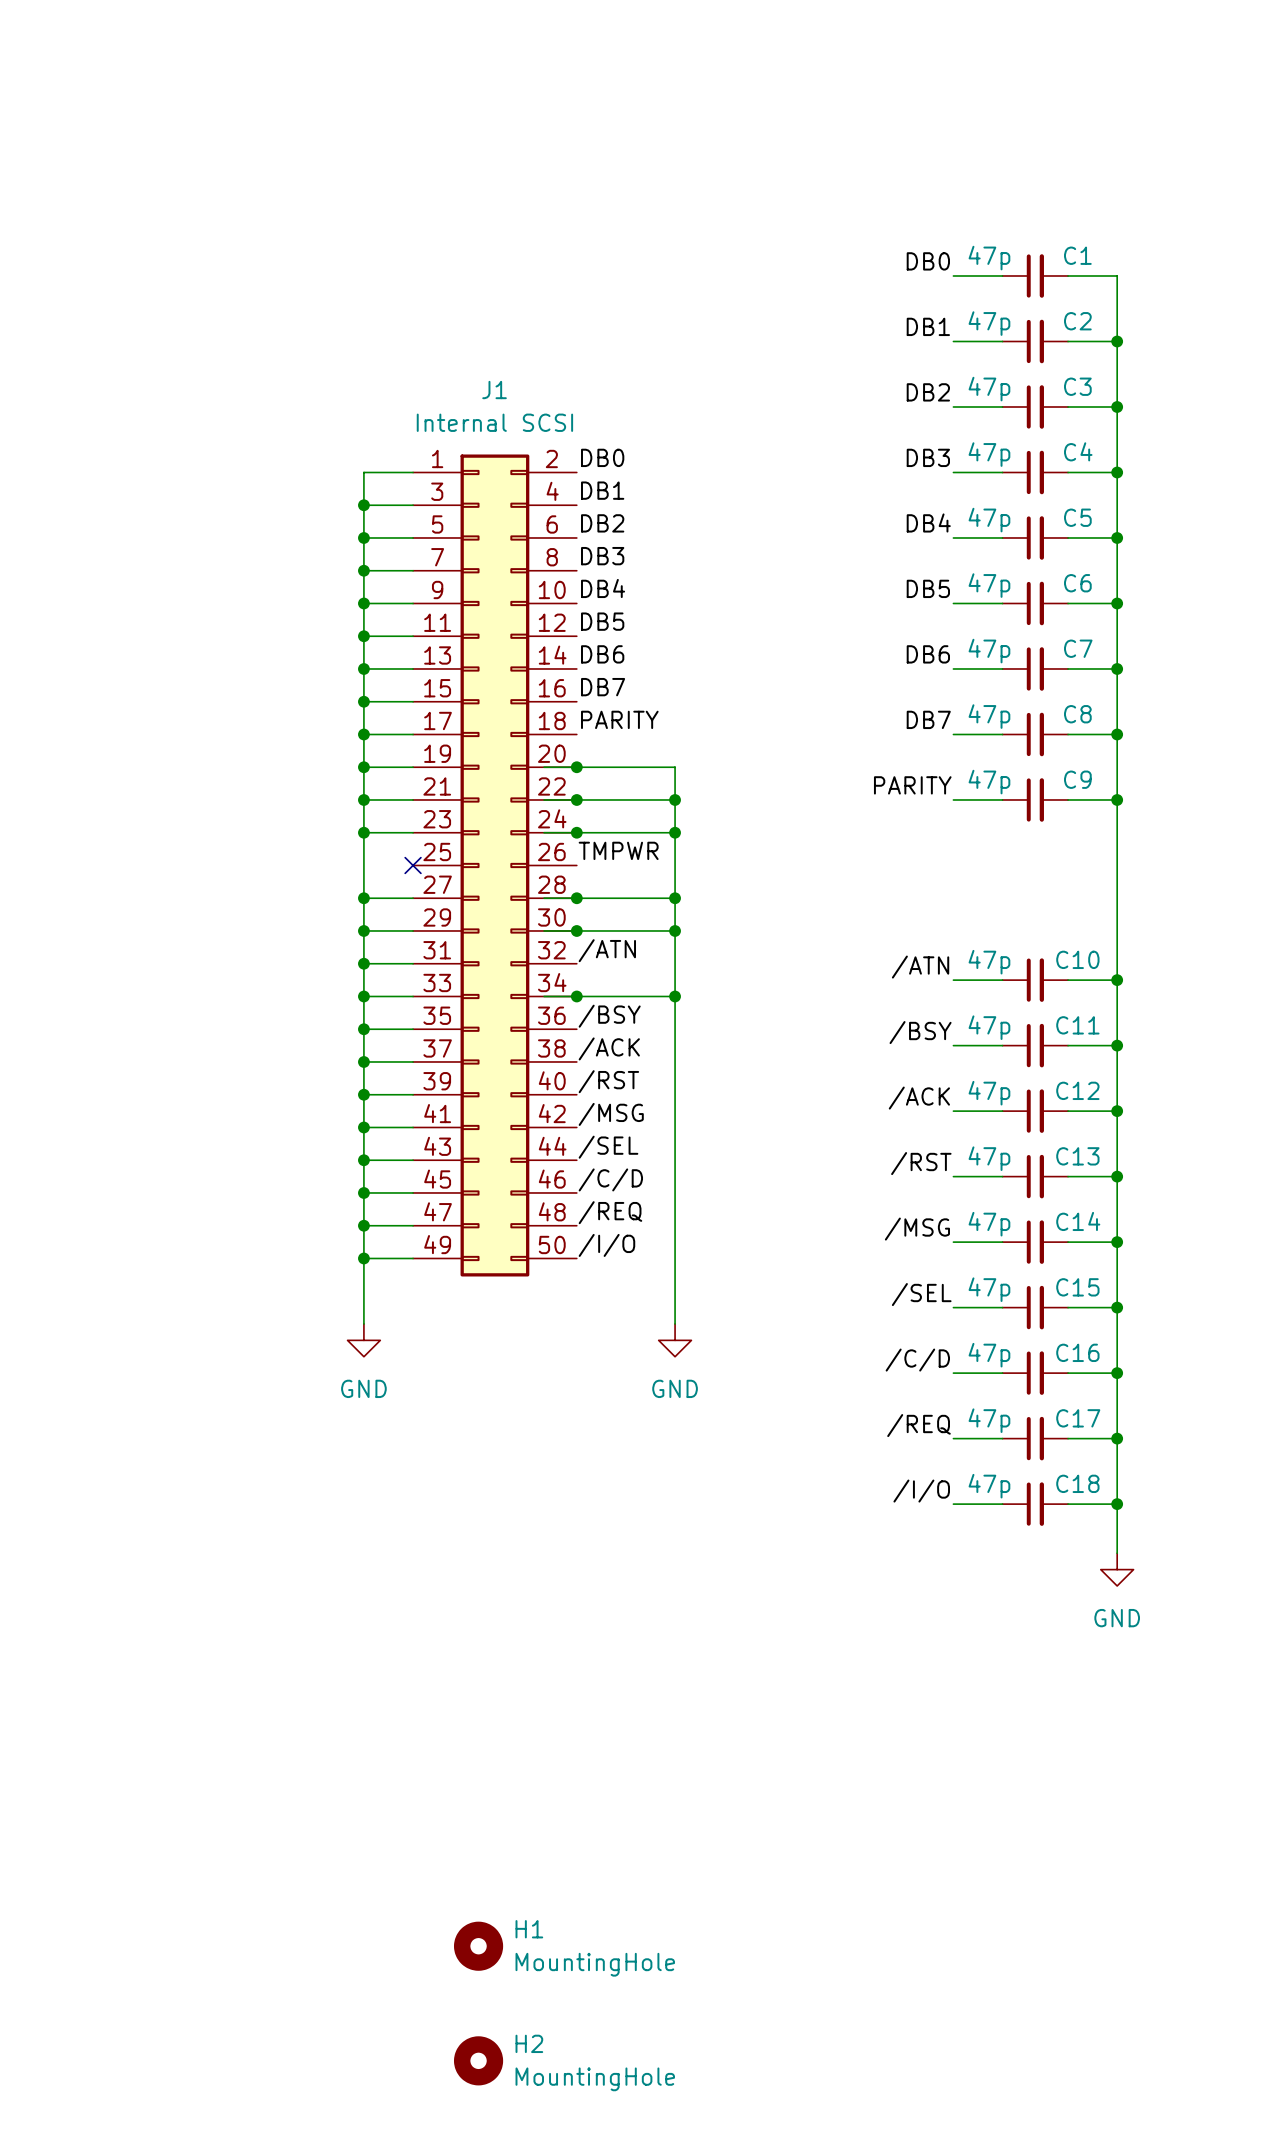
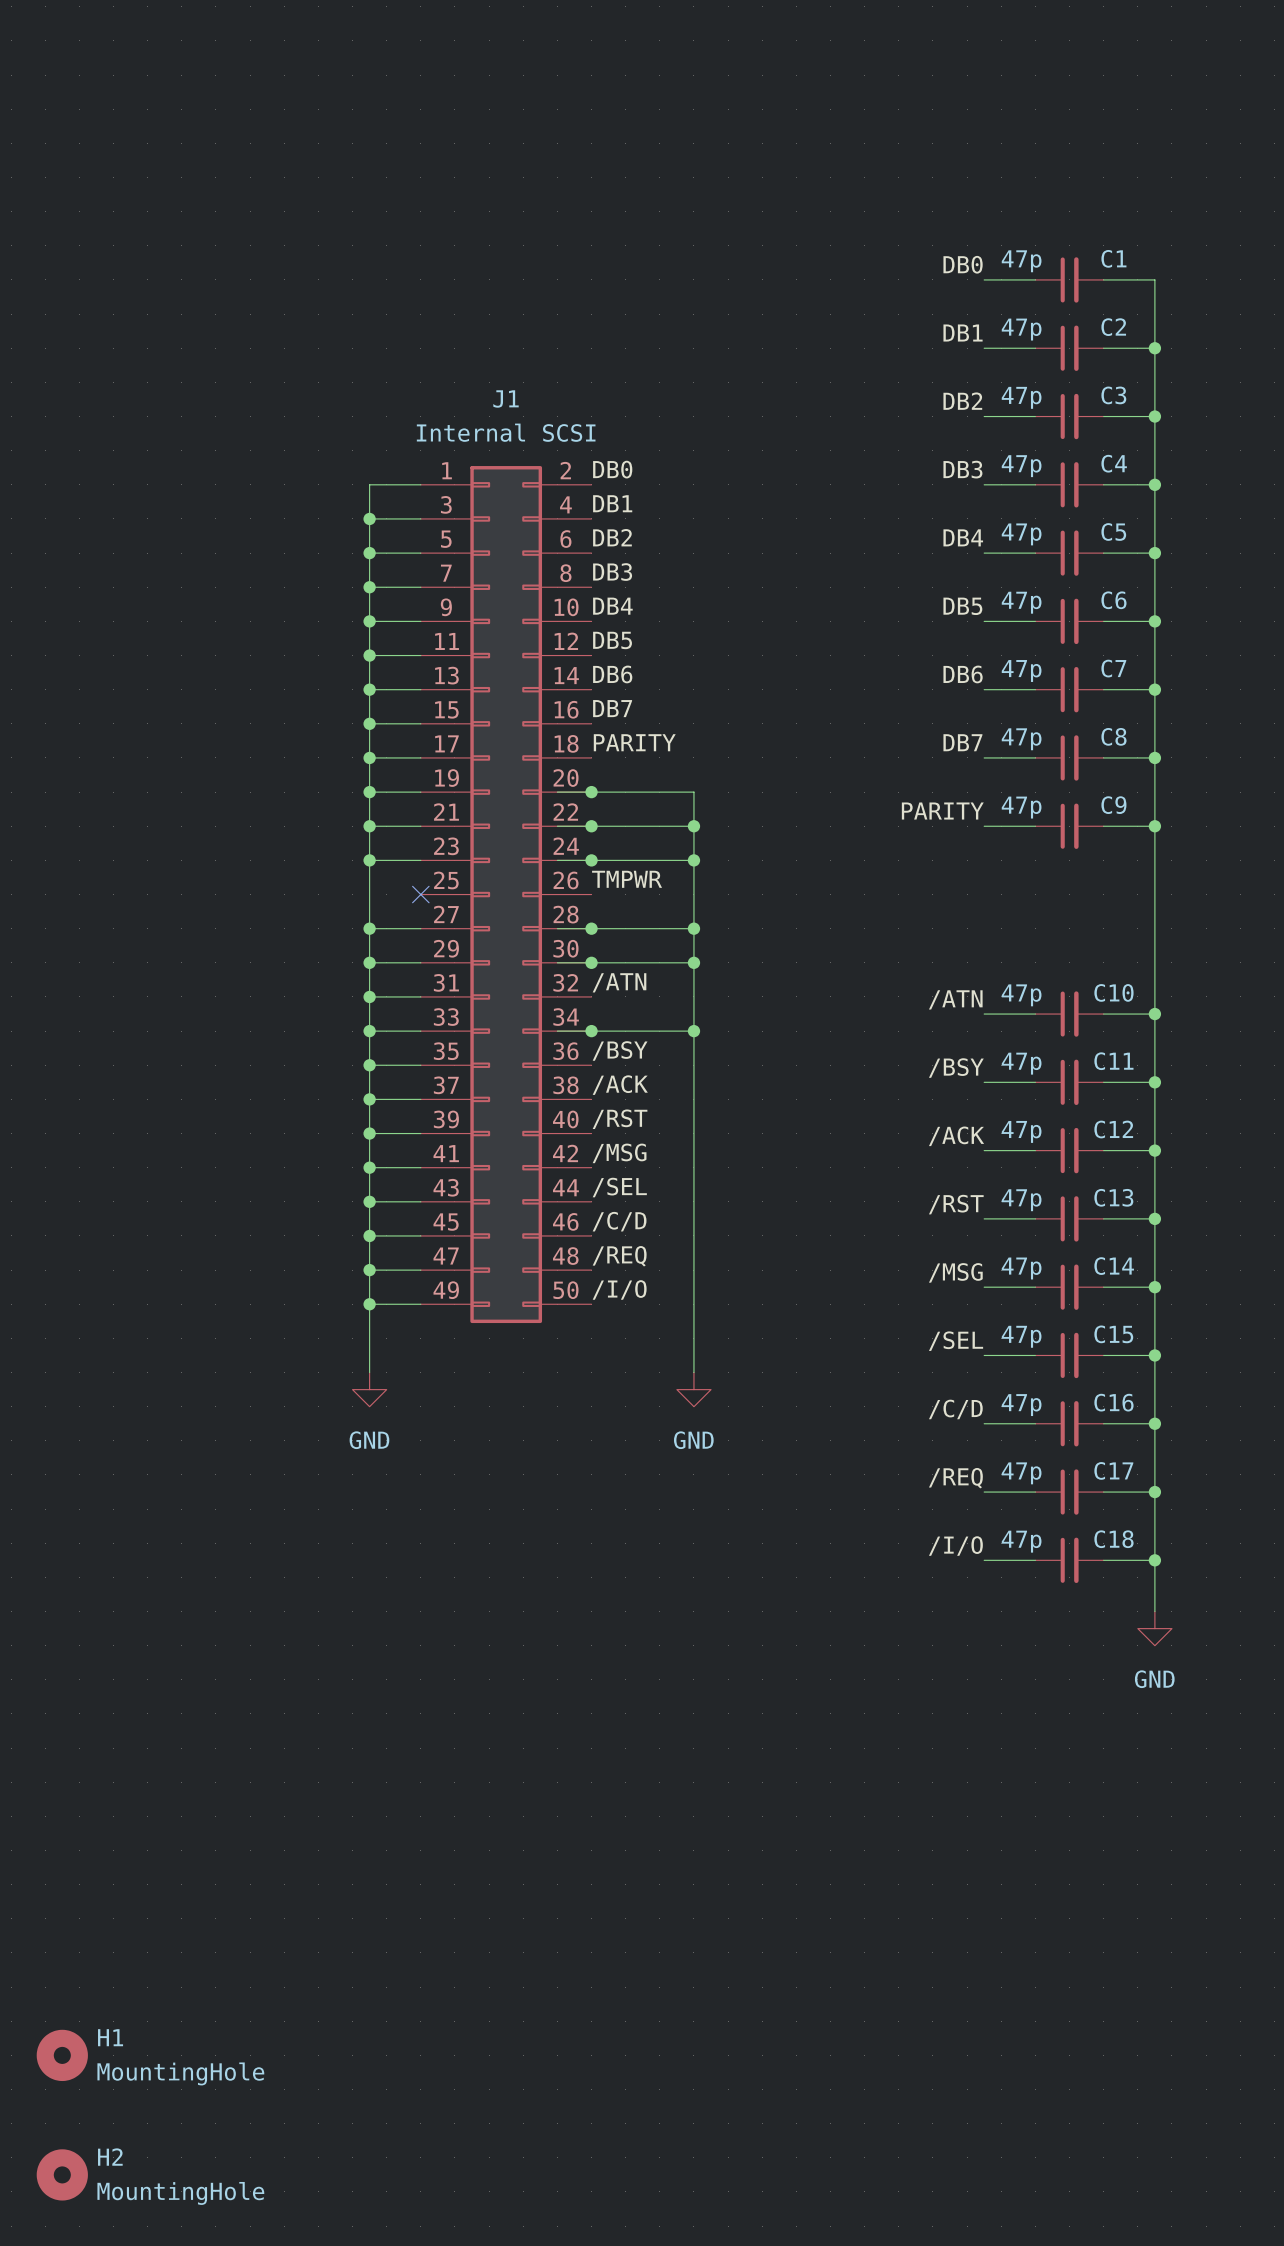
H1 position: (478, 1946) -> (62, 2055)
H2 position: (478, 2060) -> (62, 2174)

